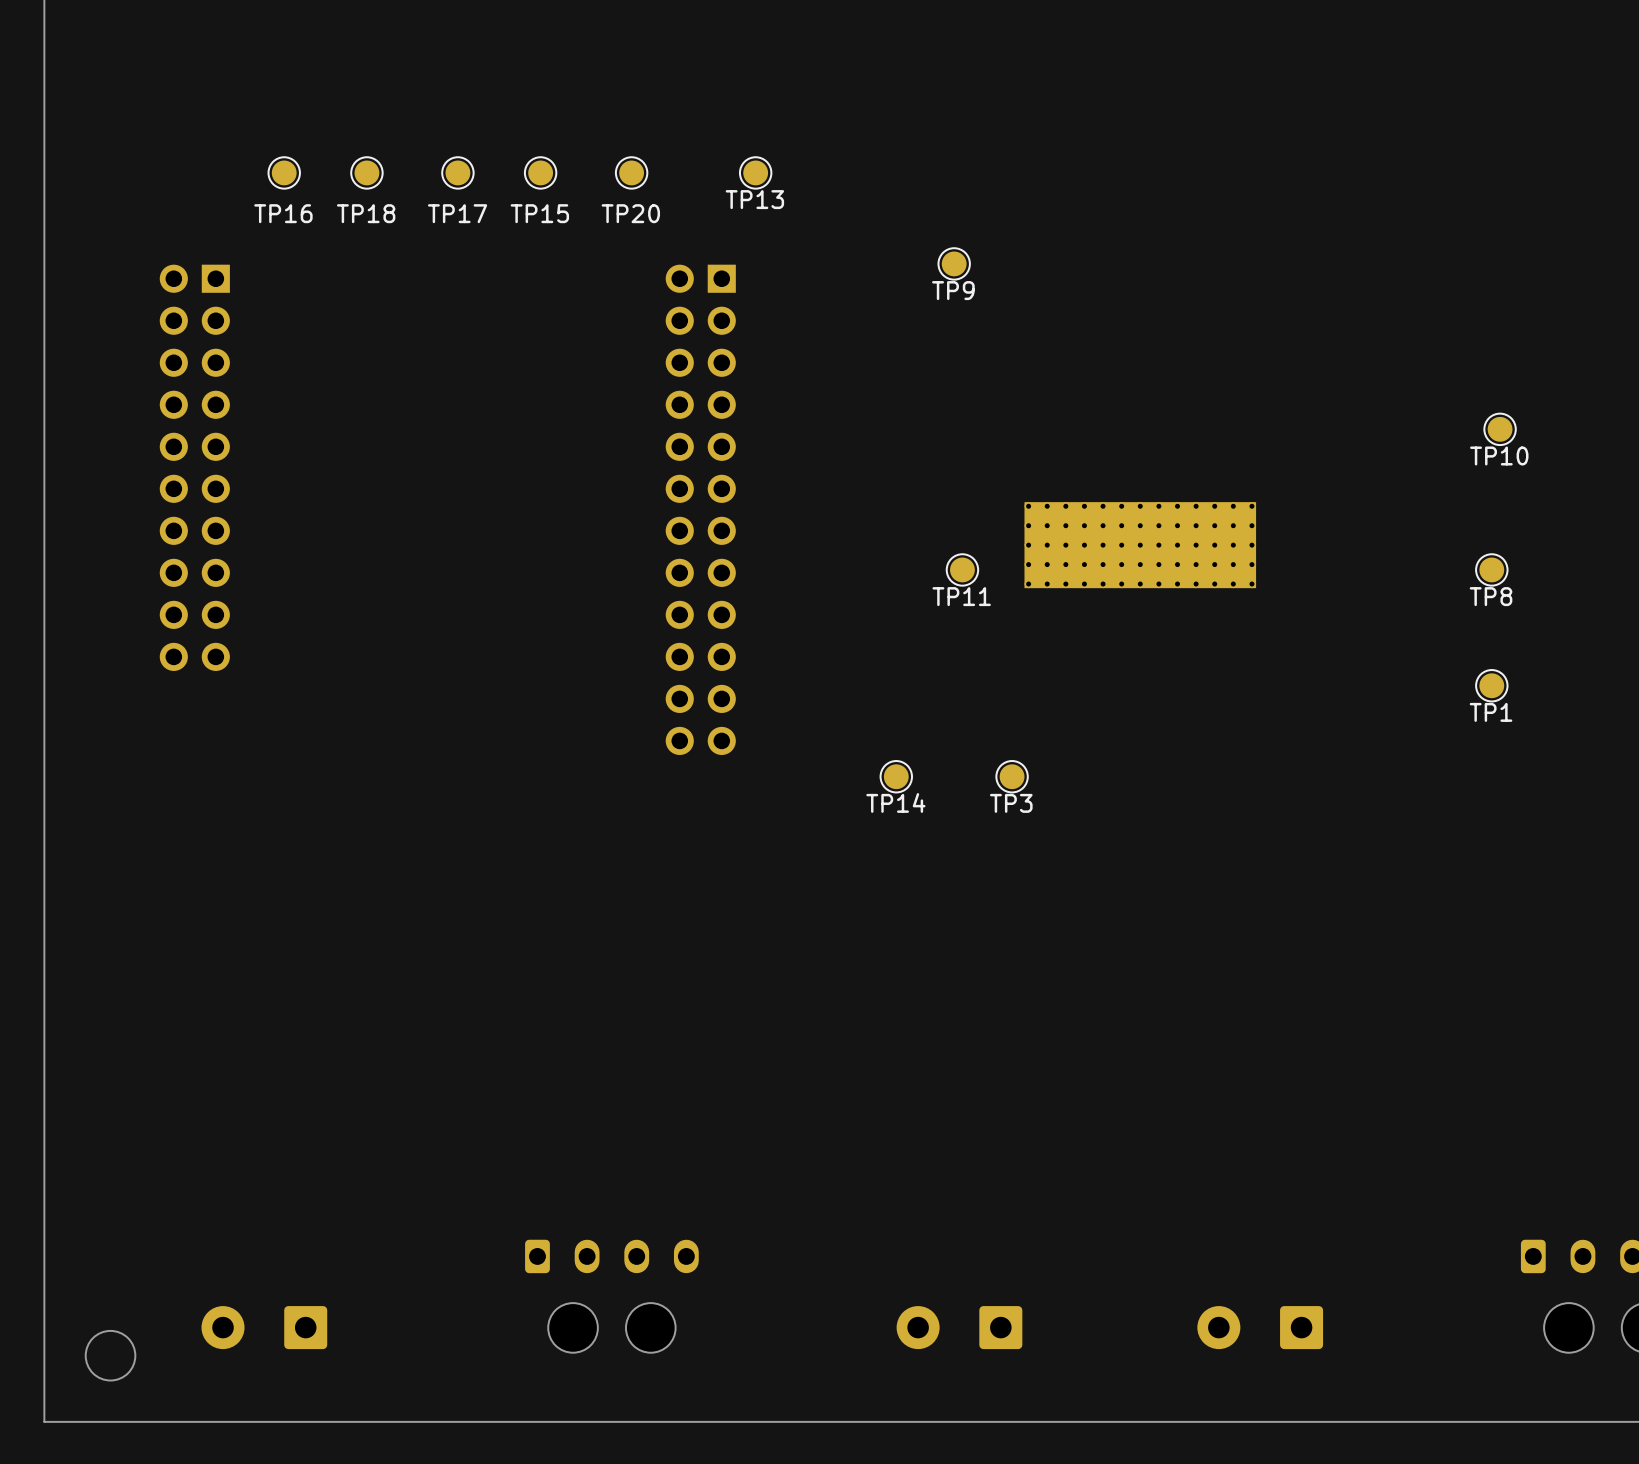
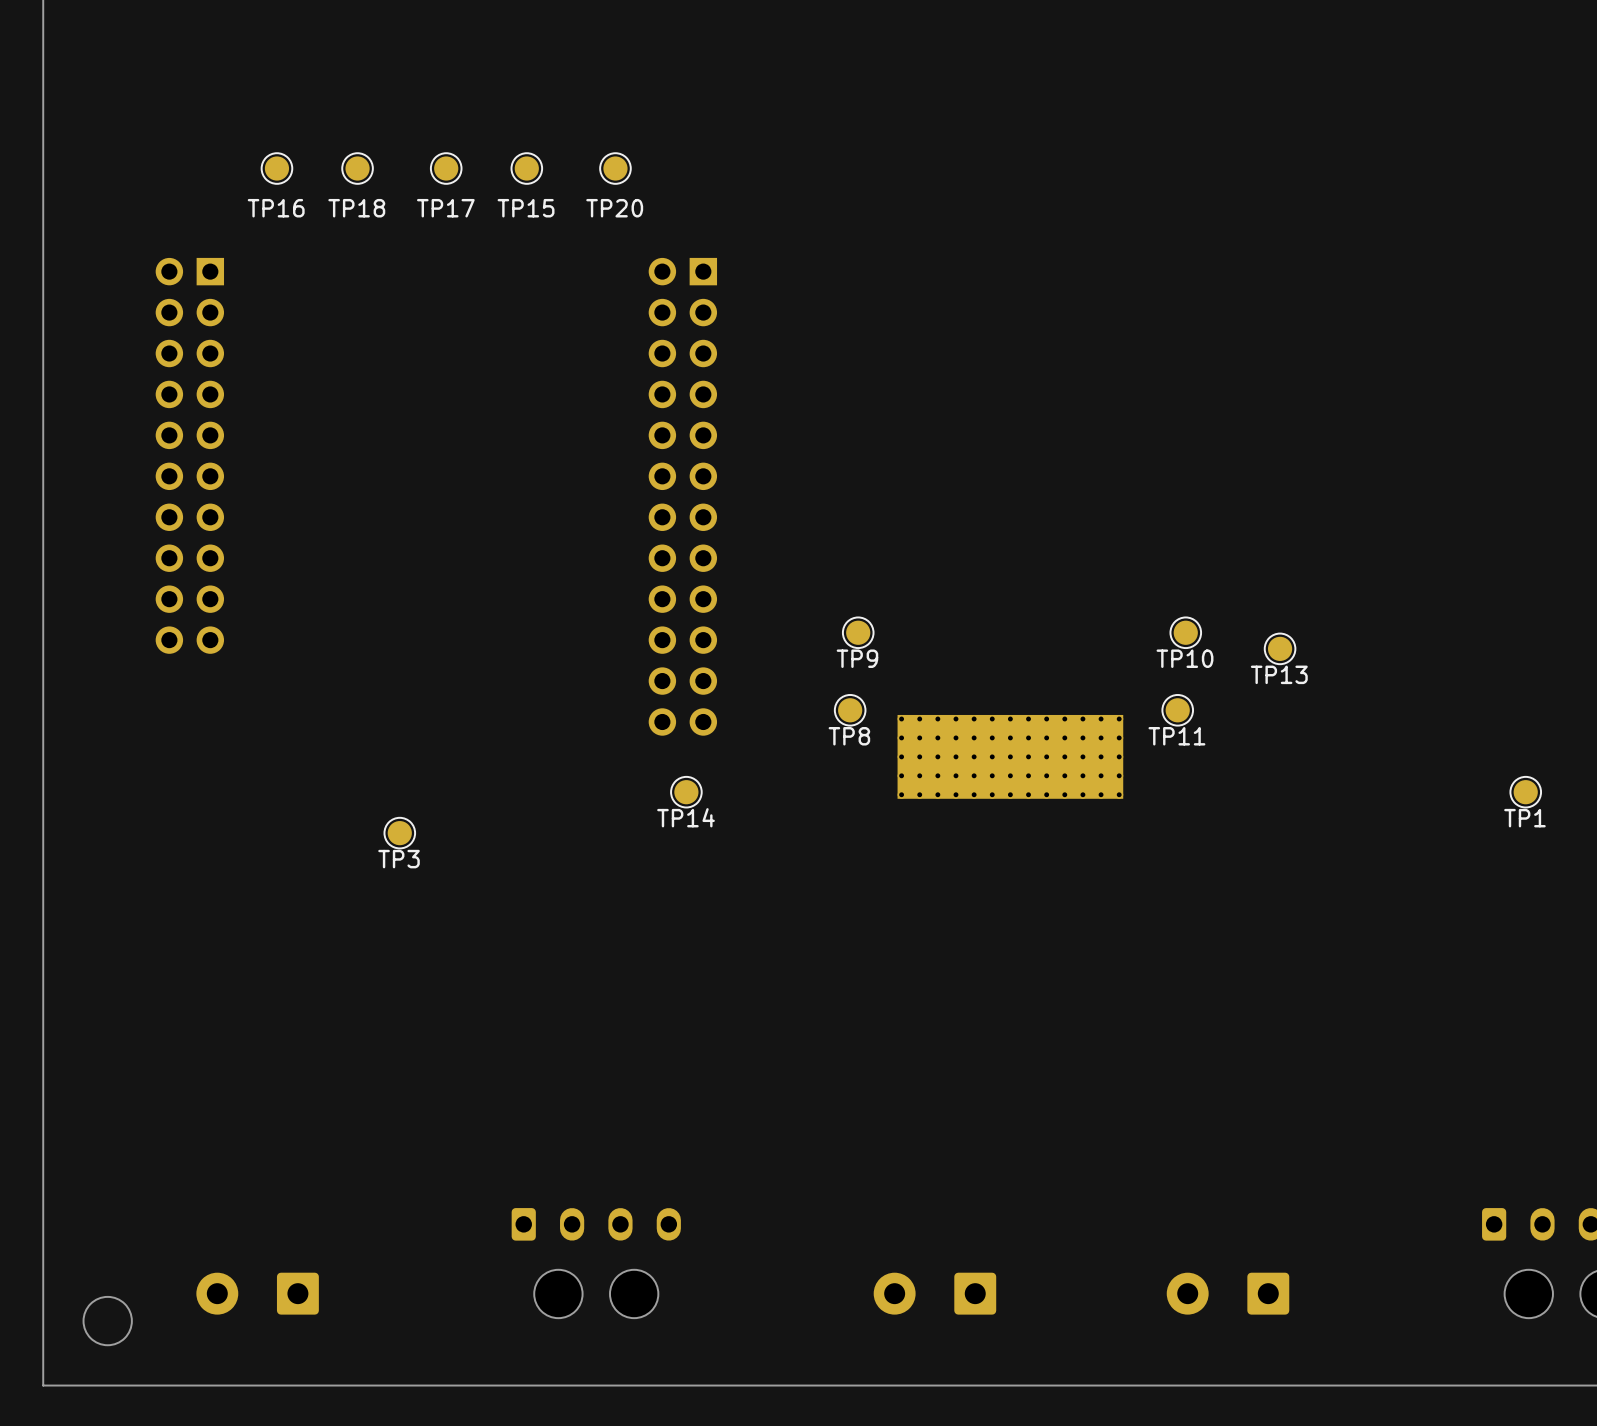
TP13 position: (755, 172) -> (1280, 648)
TP9 position: (954, 263) -> (858, 632)
TP10 position: (1500, 429) -> (1185, 632)
part position: (1140, 545) -> (1010, 756)
TP11 position: (962, 569) -> (1177, 710)
TP8 position: (1491, 569) -> (850, 710)
TP1 position: (1491, 685) -> (1525, 792)
TP14 position: (896, 776) -> (686, 792)
TP3 position: (1012, 776) -> (399, 833)

